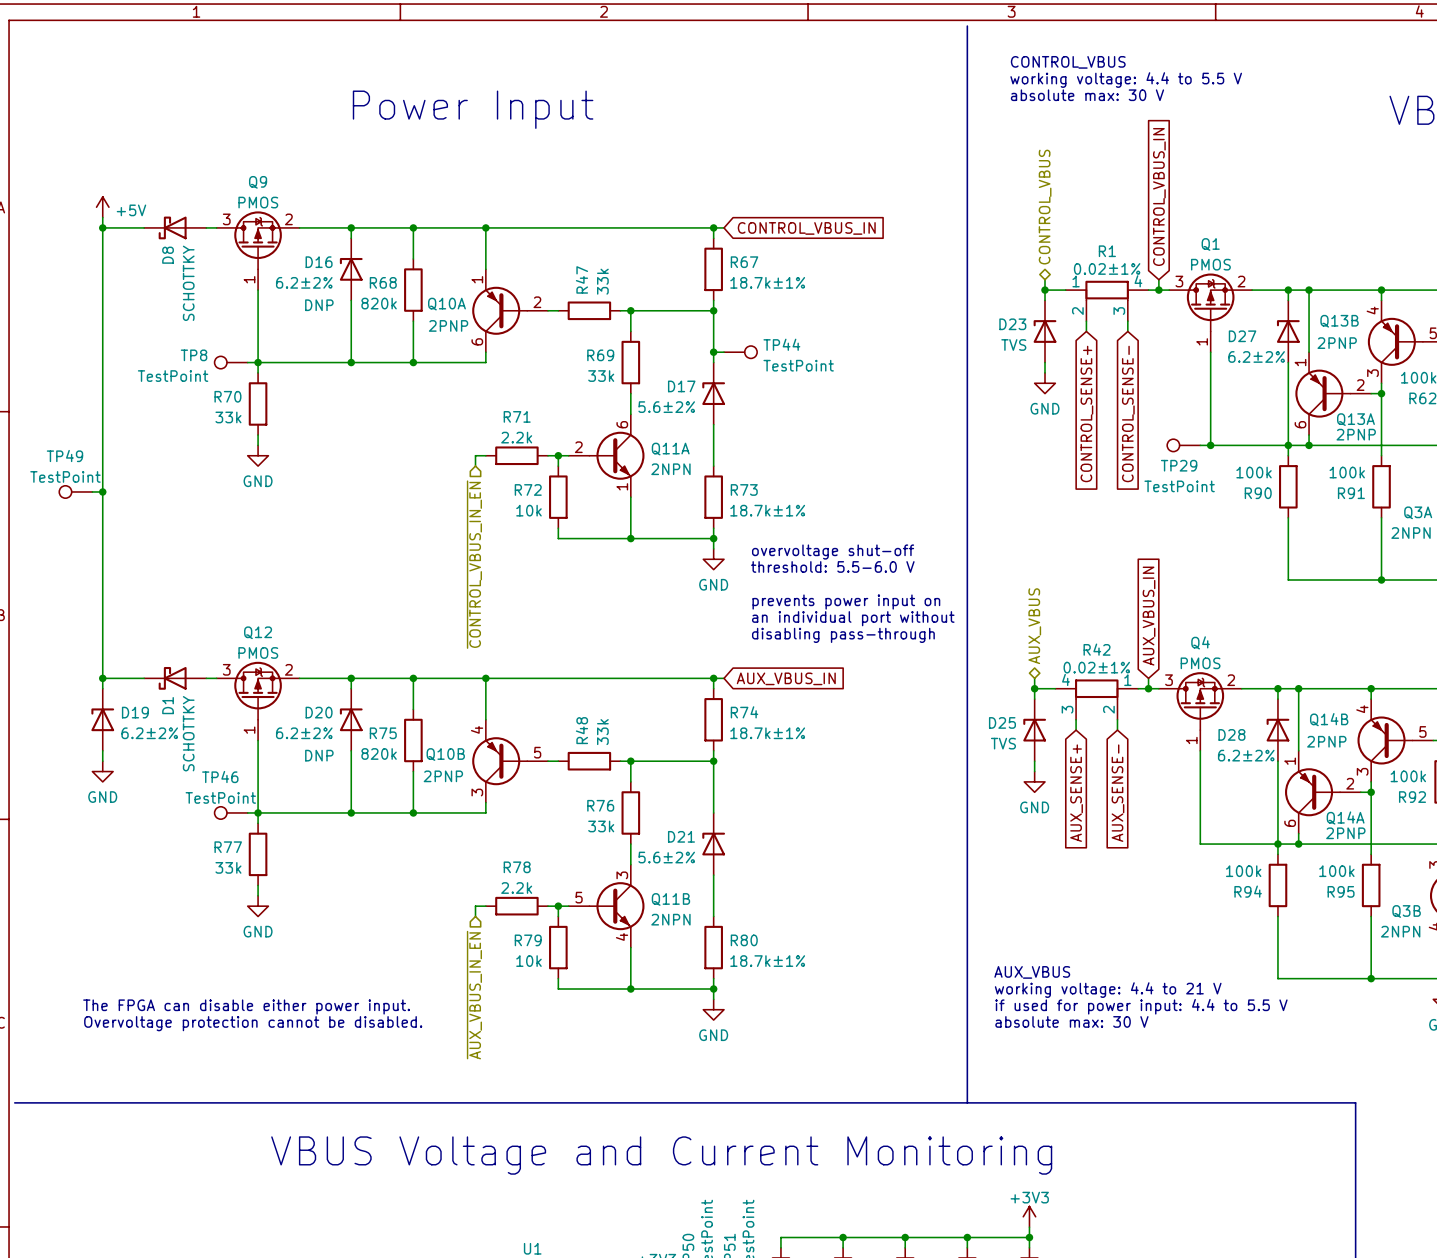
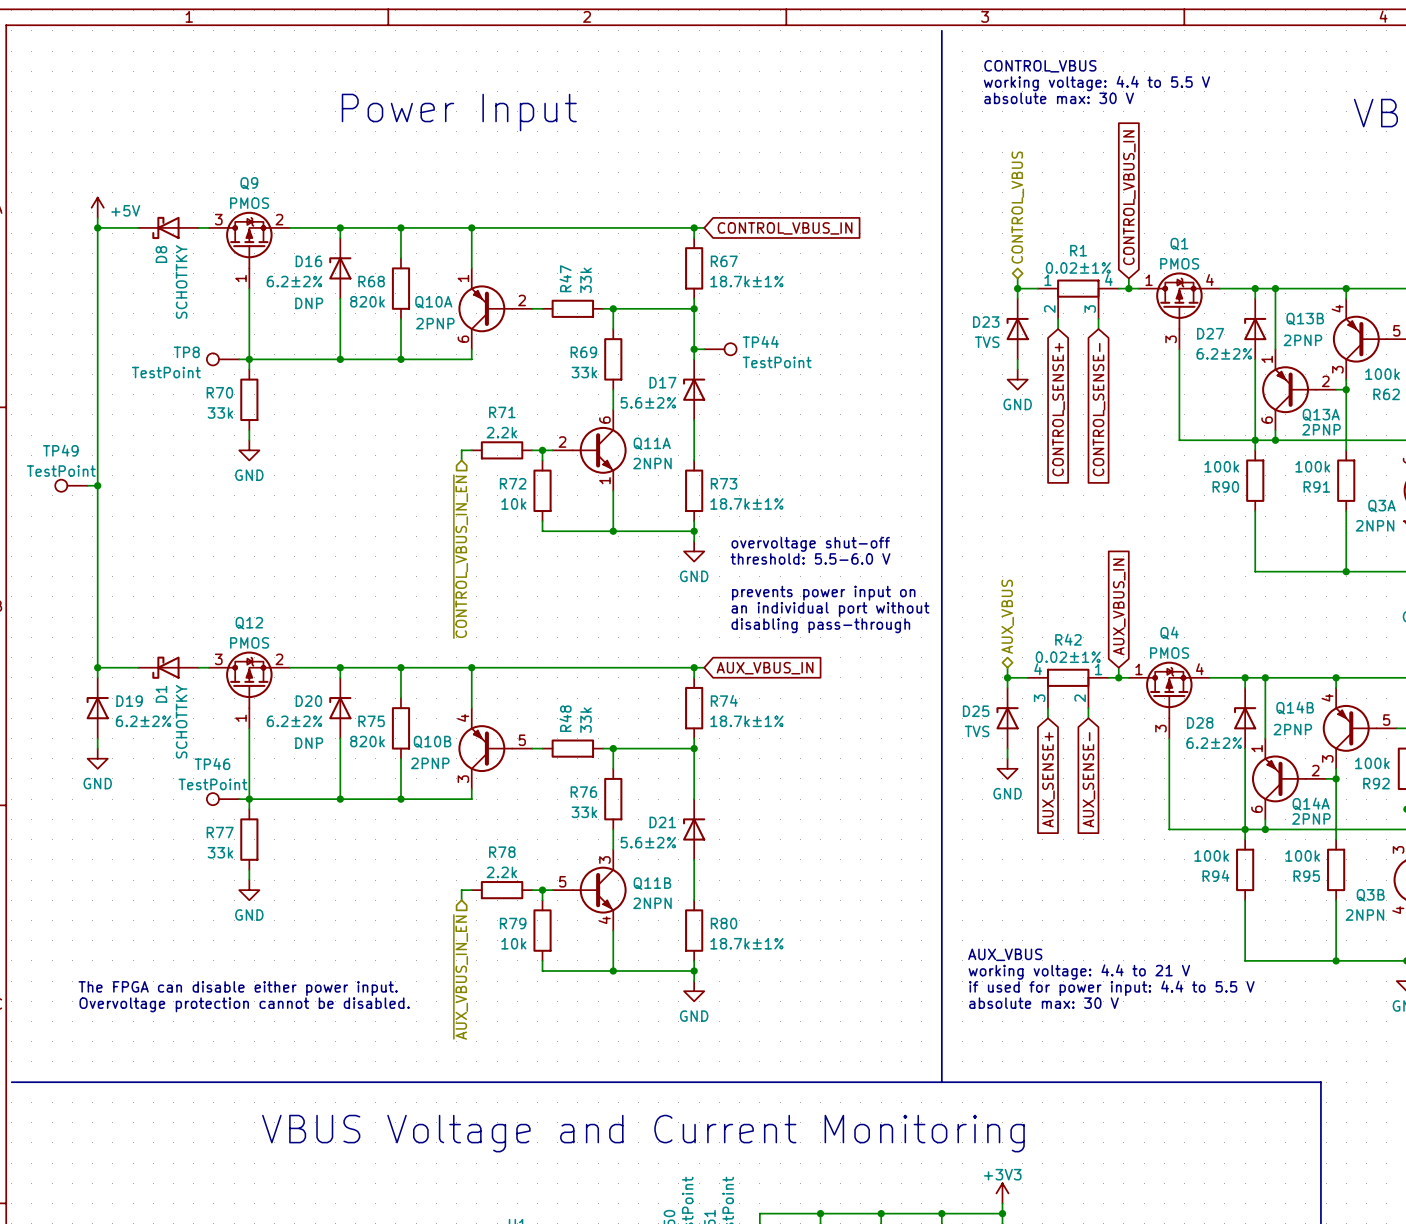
Q1 pin number: 3 (1179, 281) -> 1 (1149, 280)
Q1 pin number: 2 (1241, 281) -> 4 (1209, 280)
Q1 pin number: 1 (1202, 341) -> 3 (1171, 339)
TP29: TestPoint (1183, 445) -> none
wire: (1200, 445) (1210, 445) -> none
junction: (1210, 445) -> none
Q4 pin number: 3 (1169, 680) -> 1 (1138, 669)
Q4 pin number: 2 (1231, 680) -> 4 (1199, 669)
Q4 pin number: 1 (1191, 740) -> 3 (1160, 728)

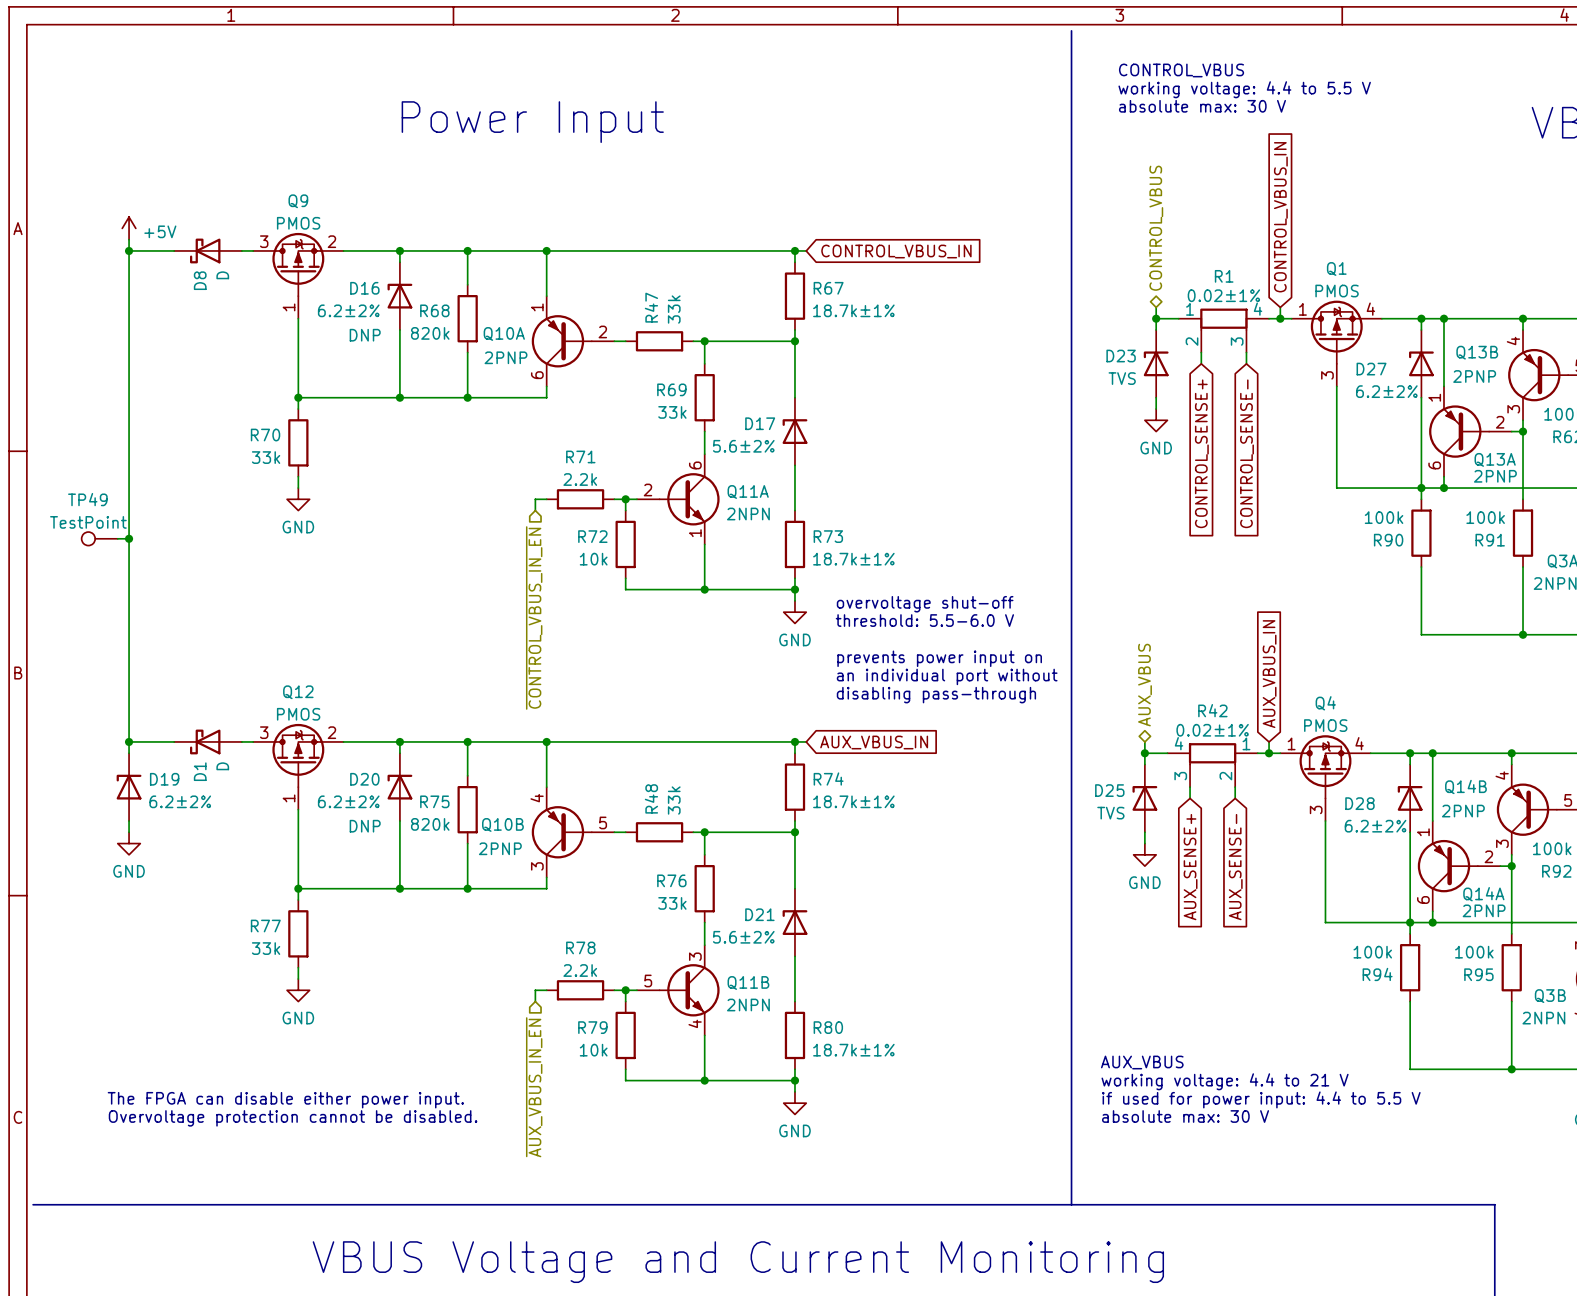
D8 value: SCHOTTKY (181, 281) -> D (222, 275)
wire: (694, 349) (704, 349) -> none
junction: (694, 349) -> none
TP44: TestPoint (720, 349) -> none
TP8: TestPoint (223, 359) -> none
wire: (239, 359) (249, 359) -> none
D1 value: SCHOTTKY (181, 721) -> D (222, 766)
TP46: TestPoint (223, 799) -> none
wire: (239, 799) (249, 799) -> none

